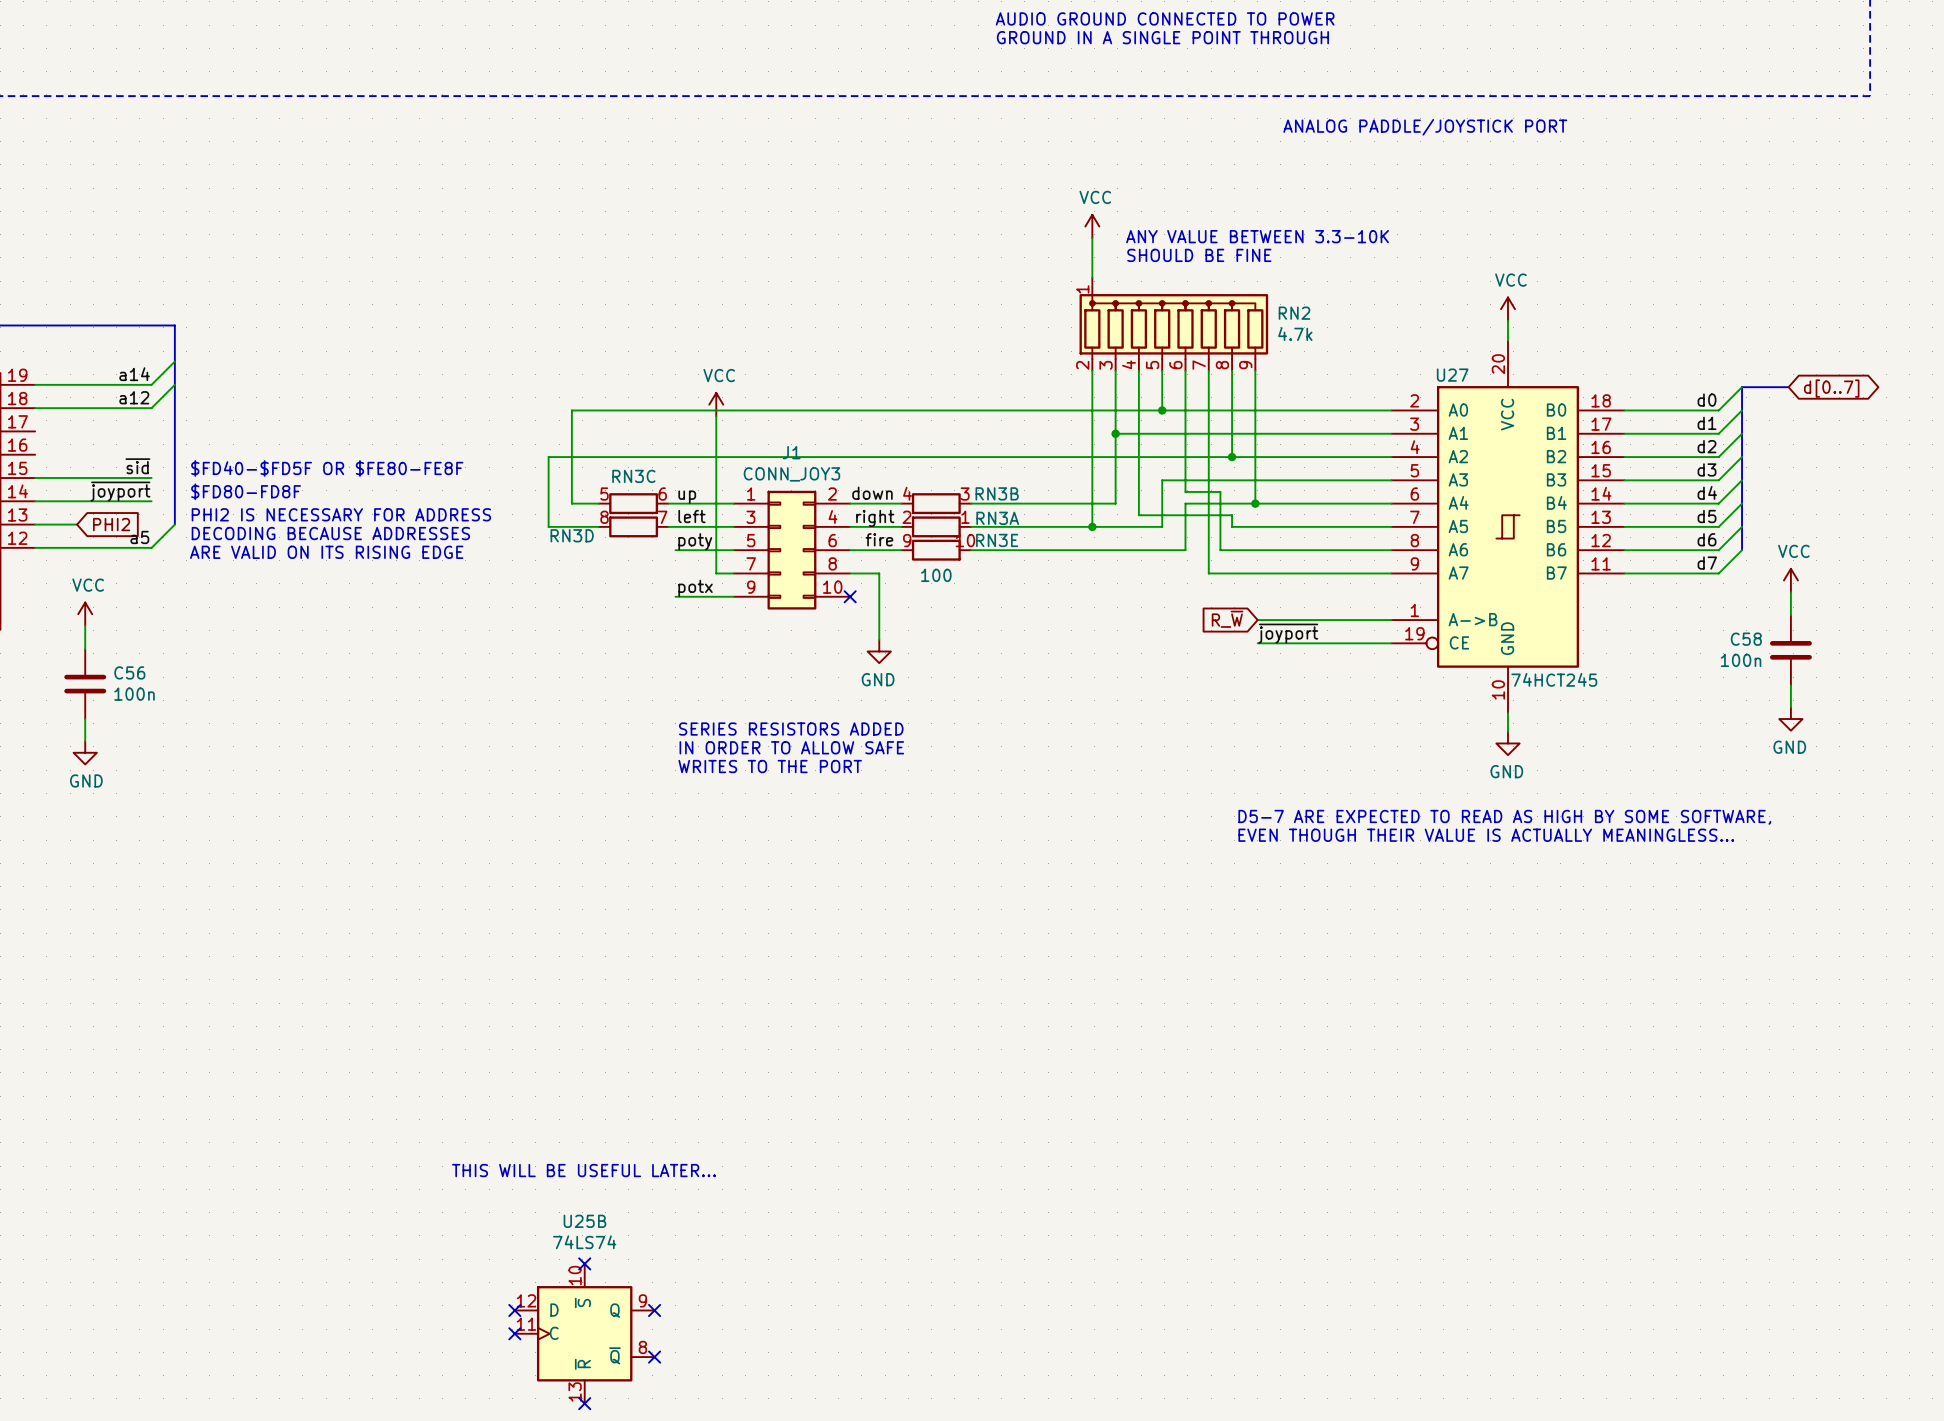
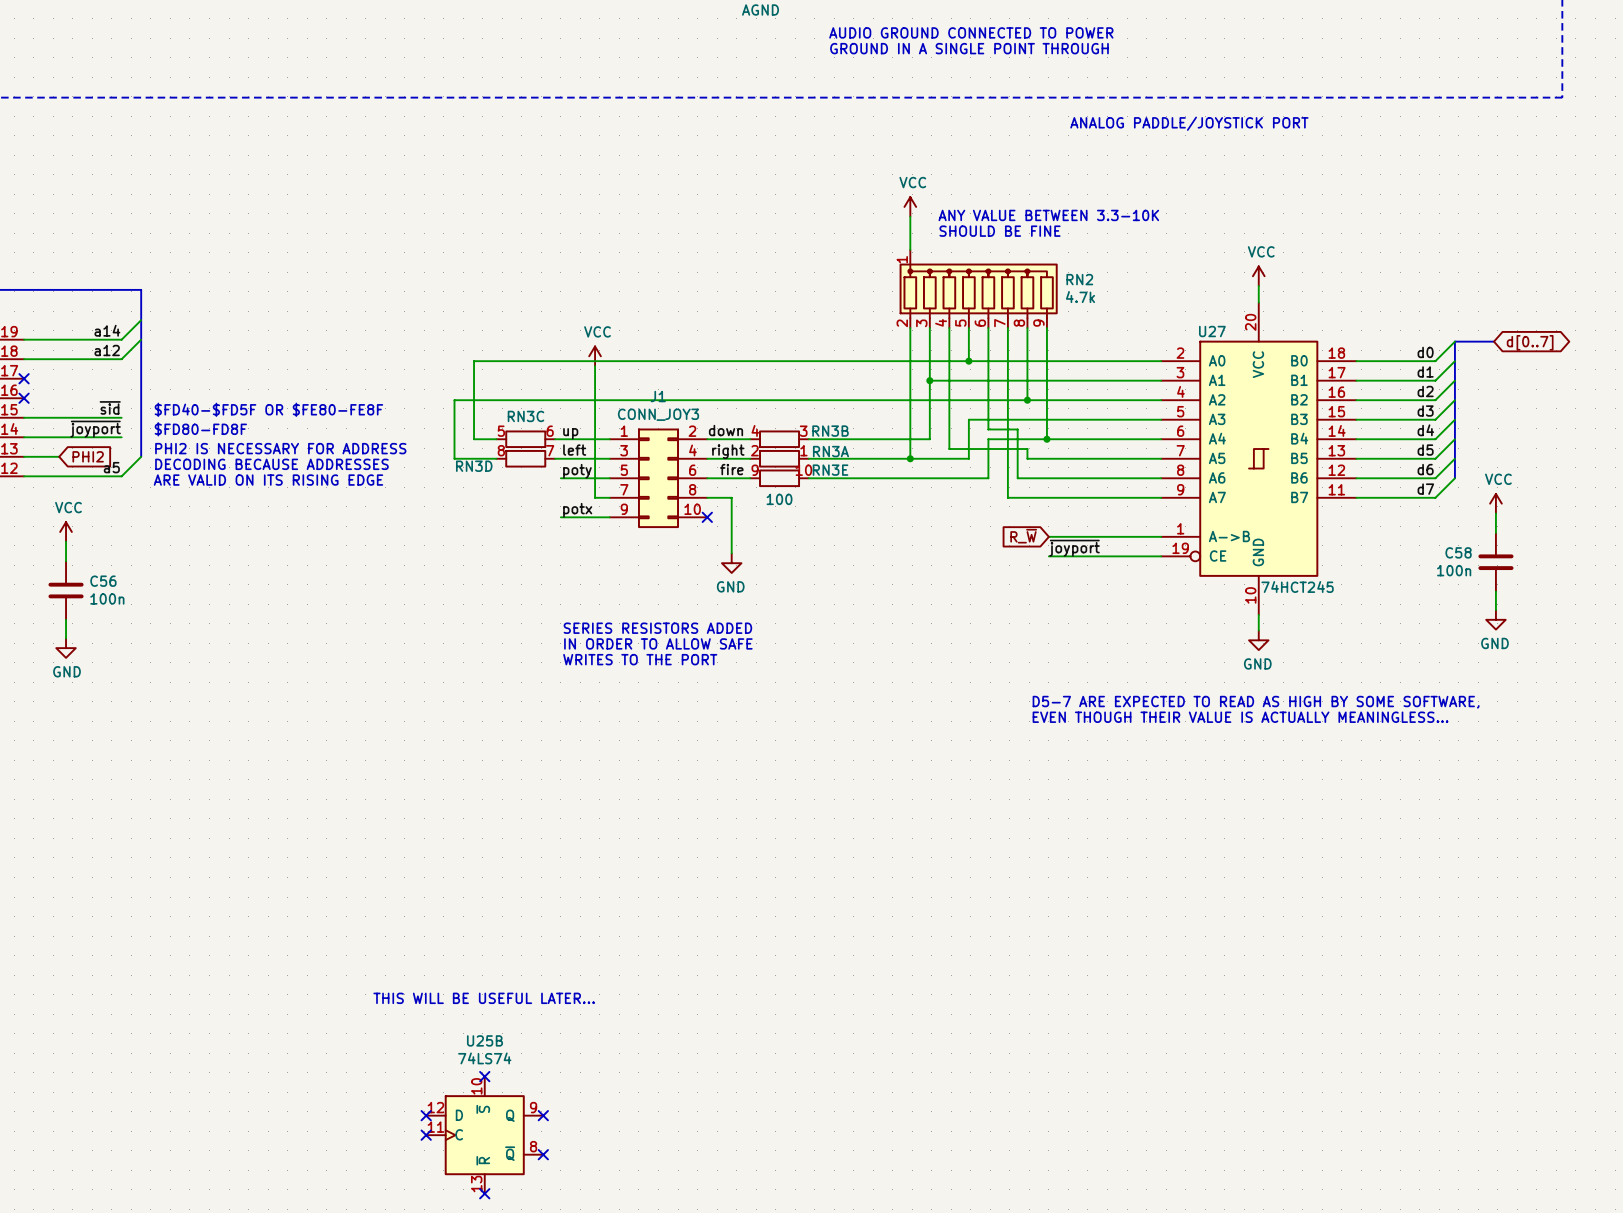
no-connect mark: none -> (24, 378)
no-connect mark: none -> (24, 398)

